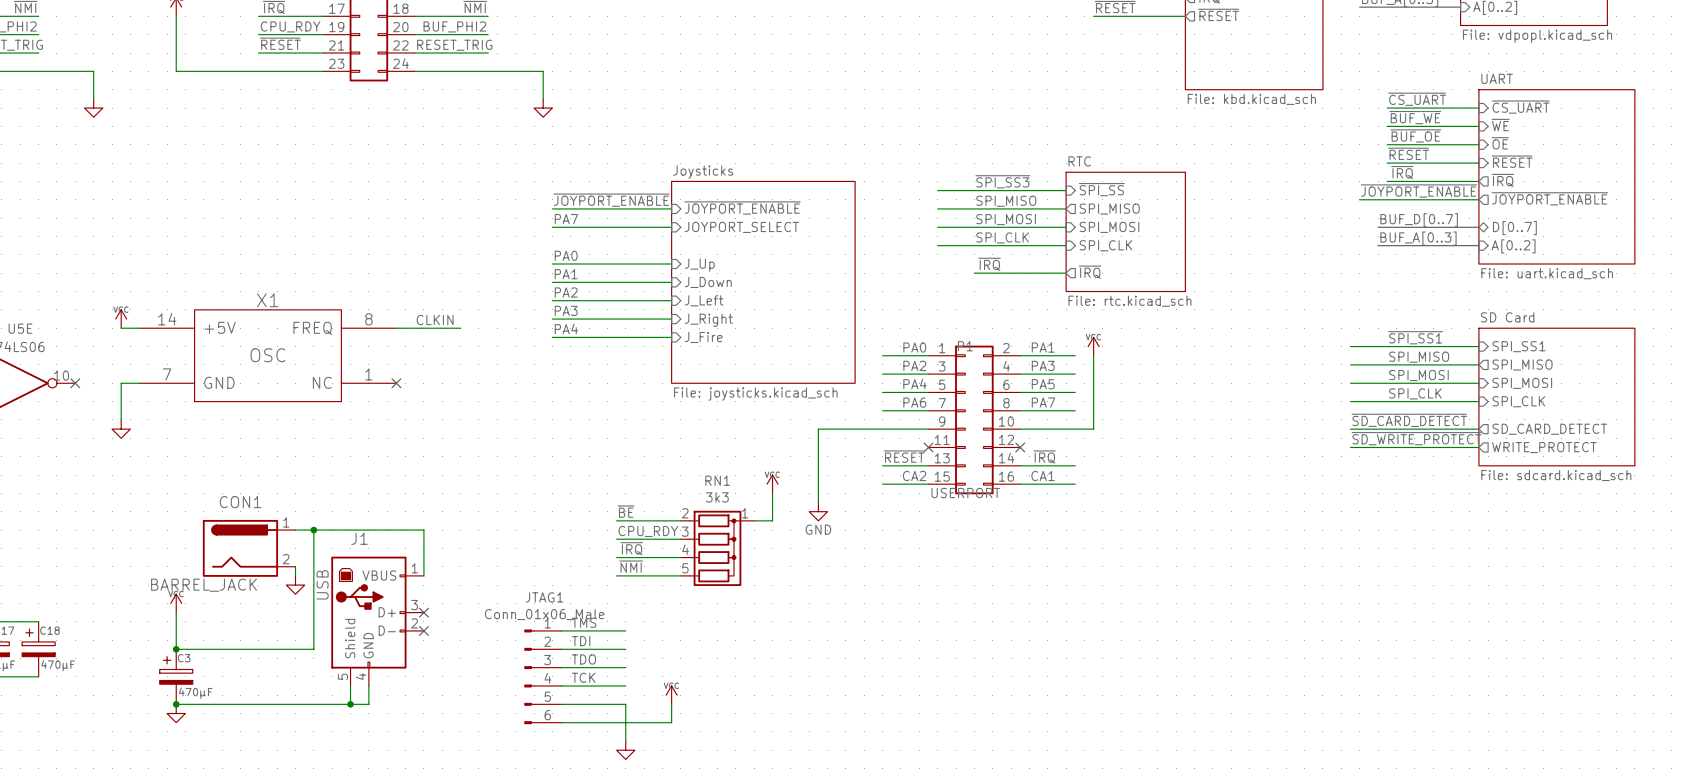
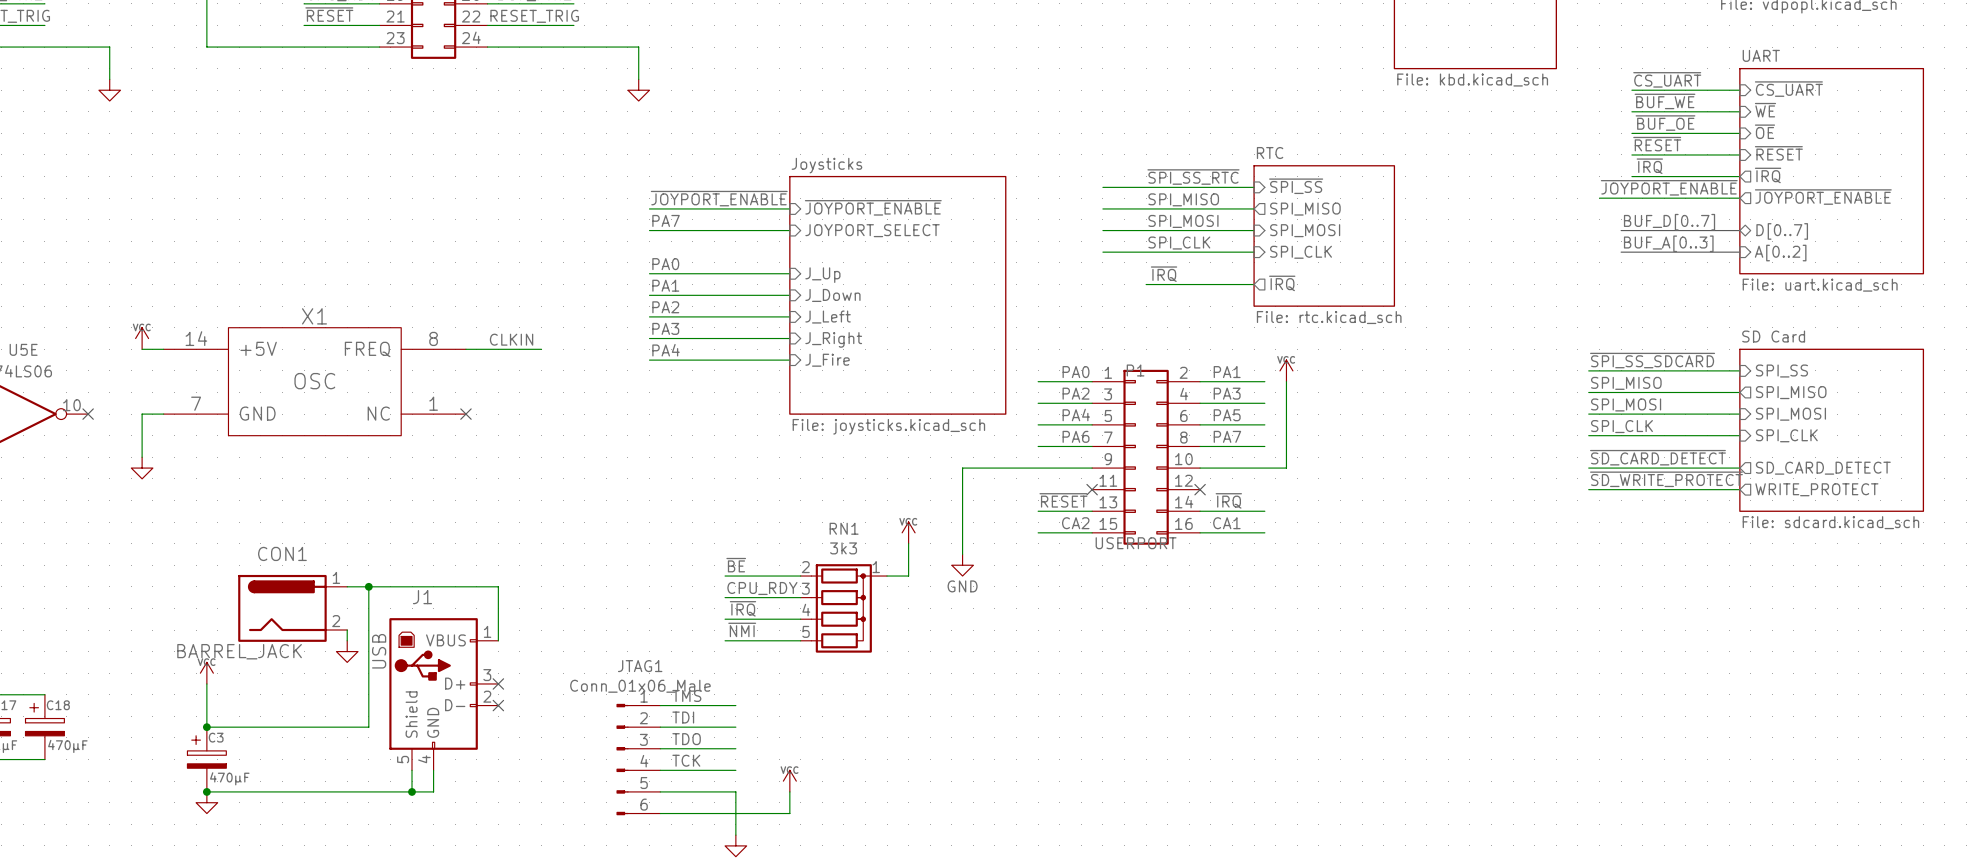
label: ~{SPI_SS3} (1002, 181) -> ~{SPI_SS_RTC} (1193, 177)
label: ~{SPI_SS1} (1415, 337) -> ~{SPI_SS_SDCARD} (1652, 360)
sheet pin: SPI_SS1 (1519, 346) -> SPI_SS (1781, 371)
label position: SPI_MISO (1419, 357) -> SPI_MISO (1626, 383)
label position: SPI_MOSI (1418, 375) -> SPI_MOSI (1626, 404)
label position: SPI_CLK (1415, 393) -> SPI_CLK (1621, 426)

